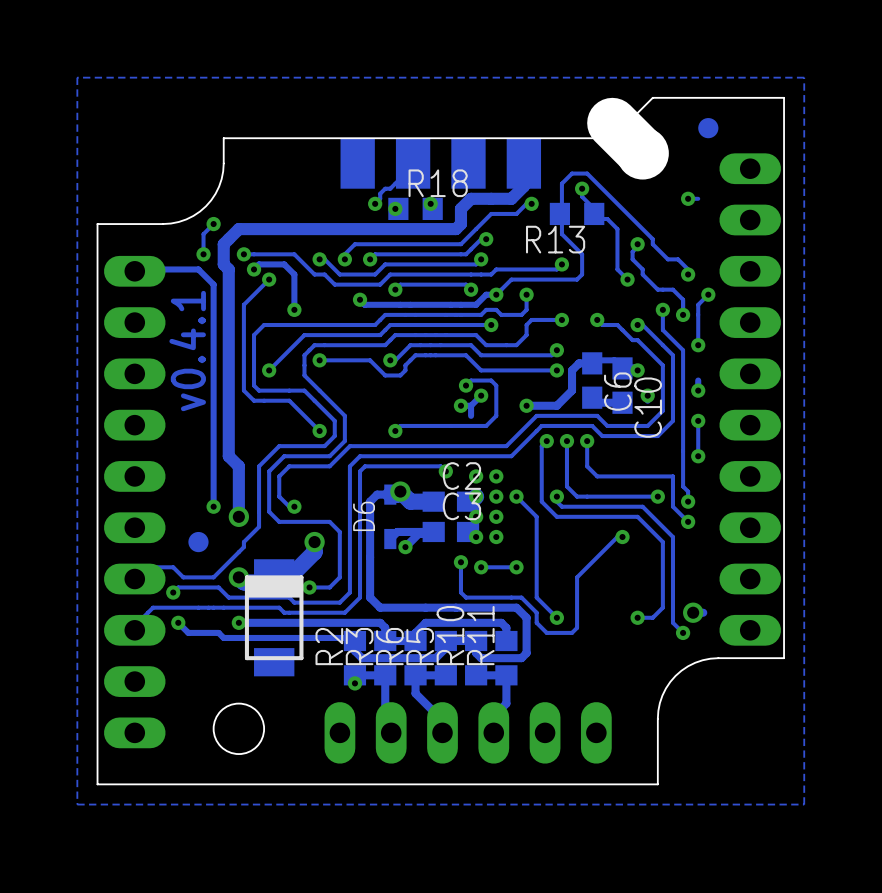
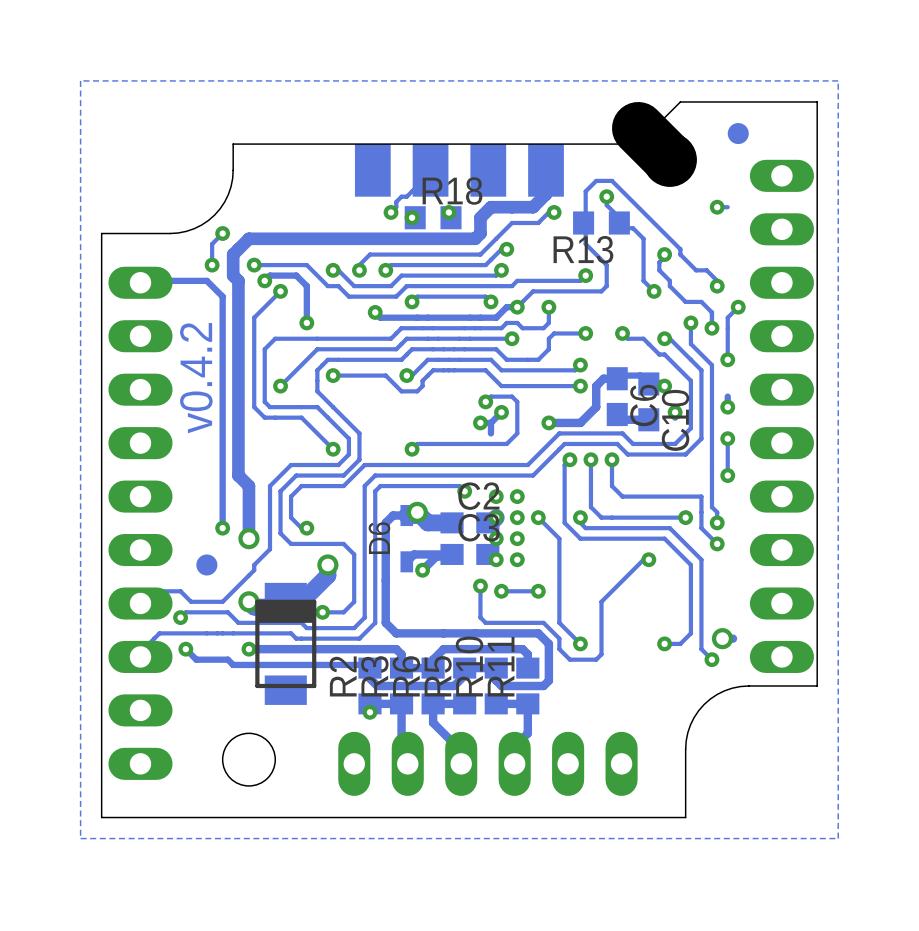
text: v0.4.1 (187, 351) -> v0.4.2 (196, 378)

